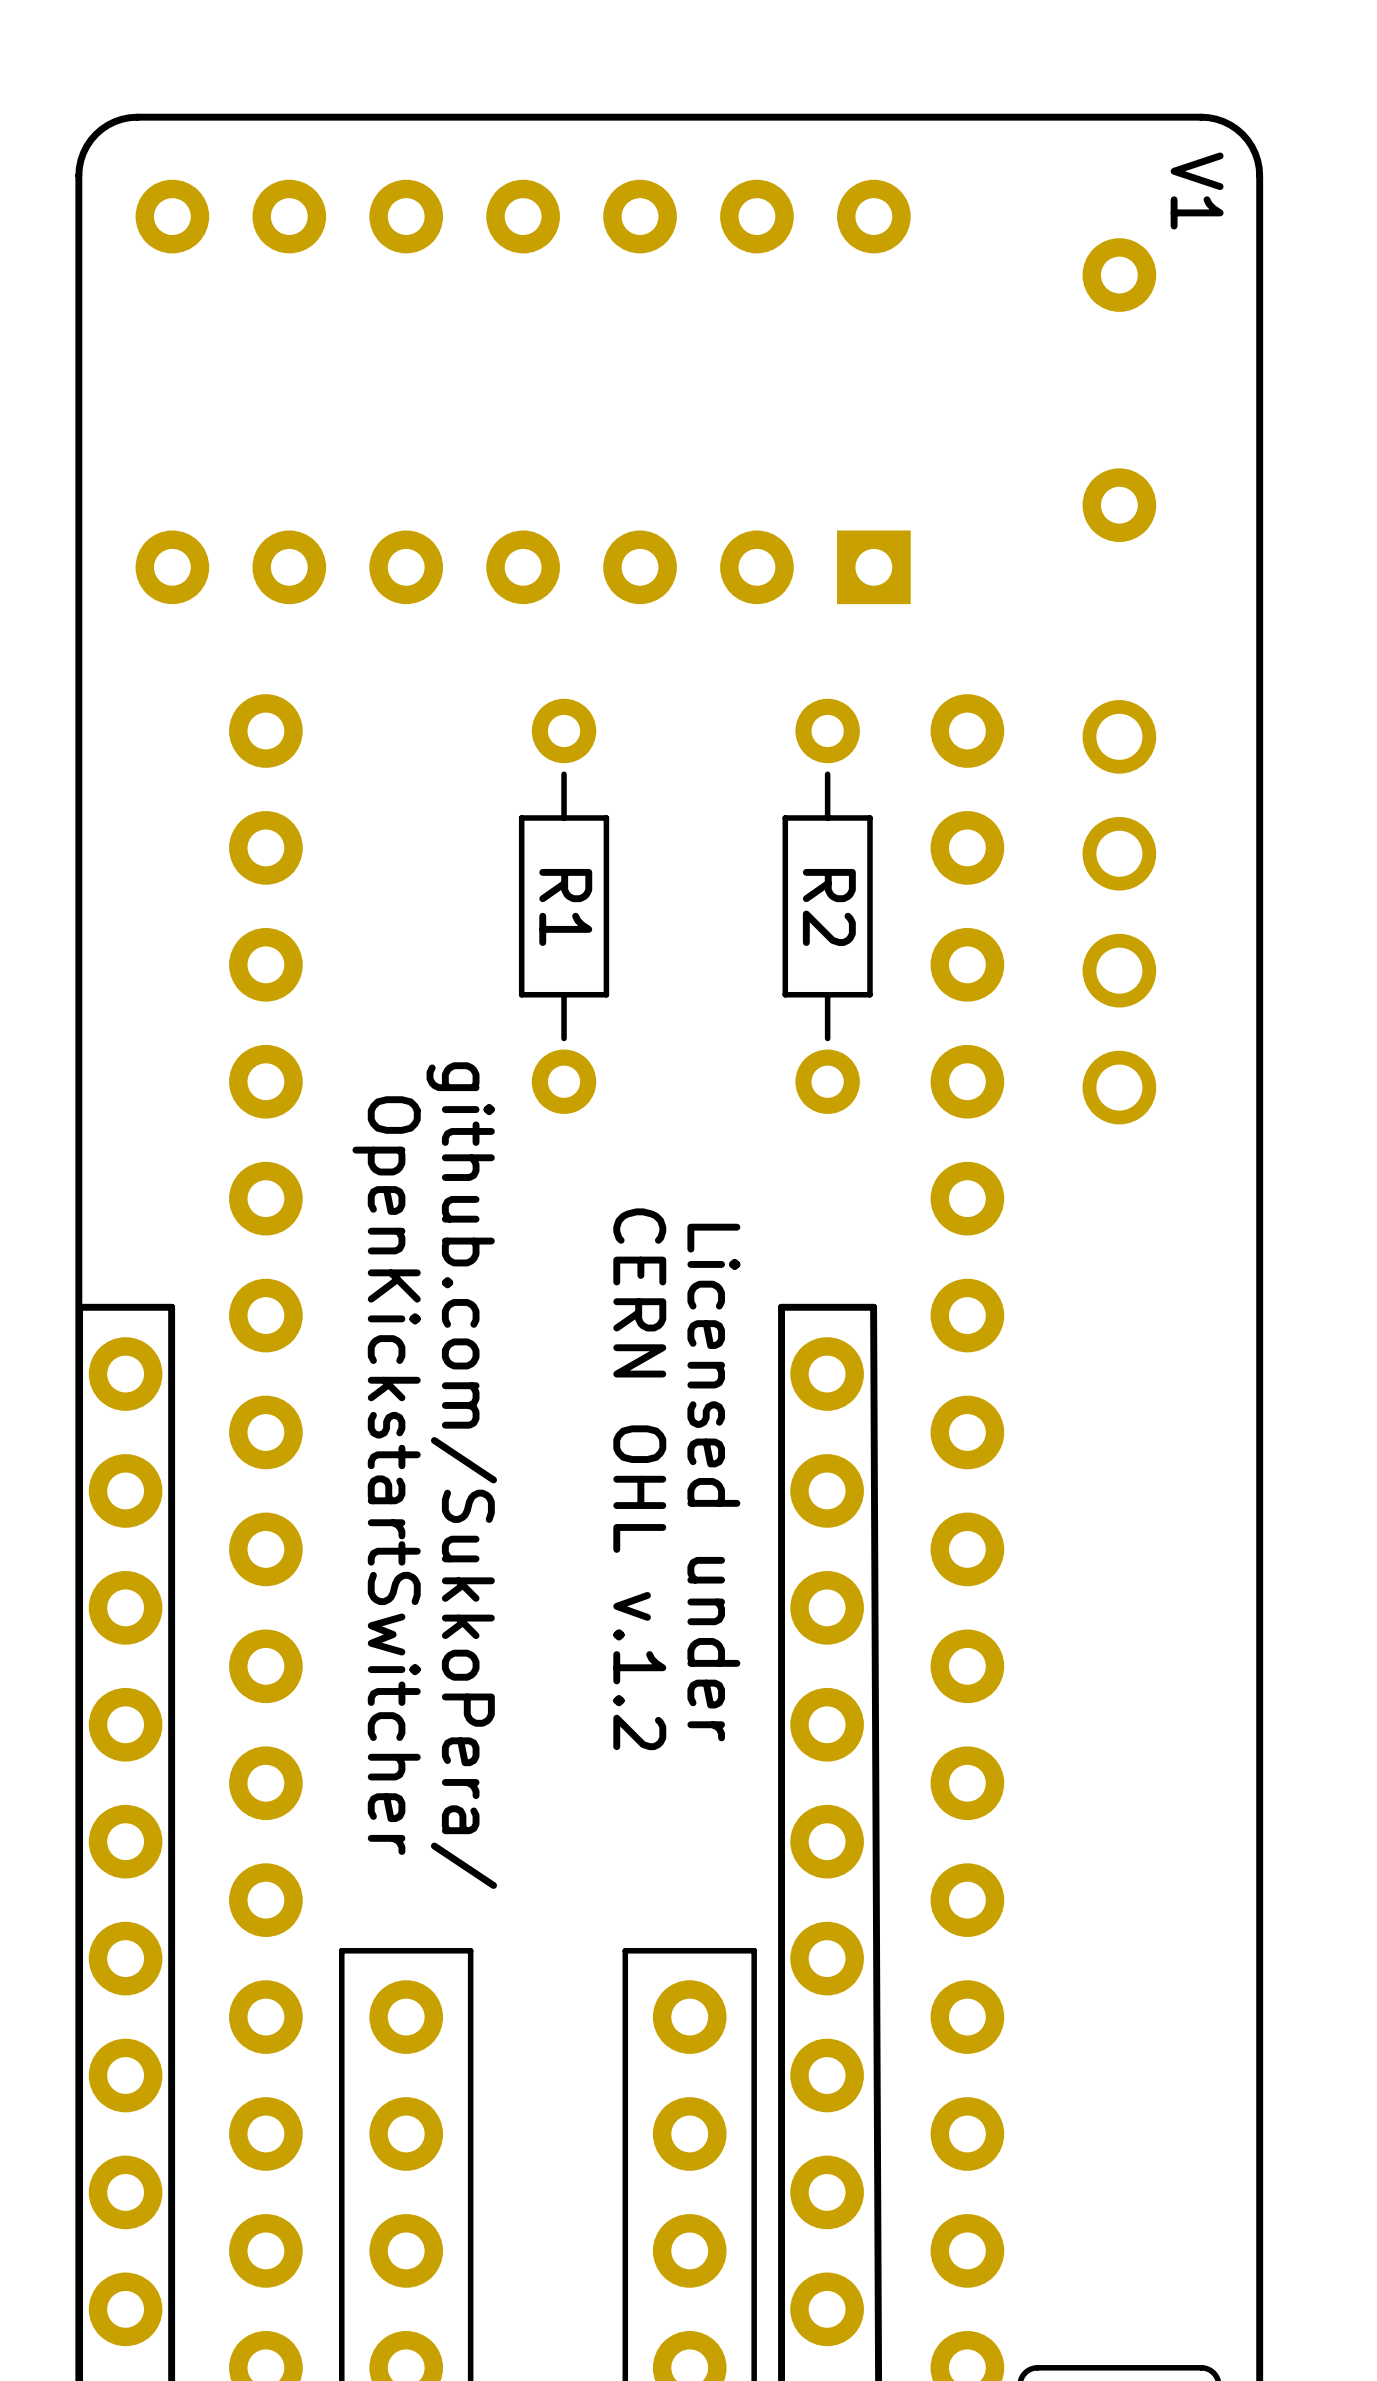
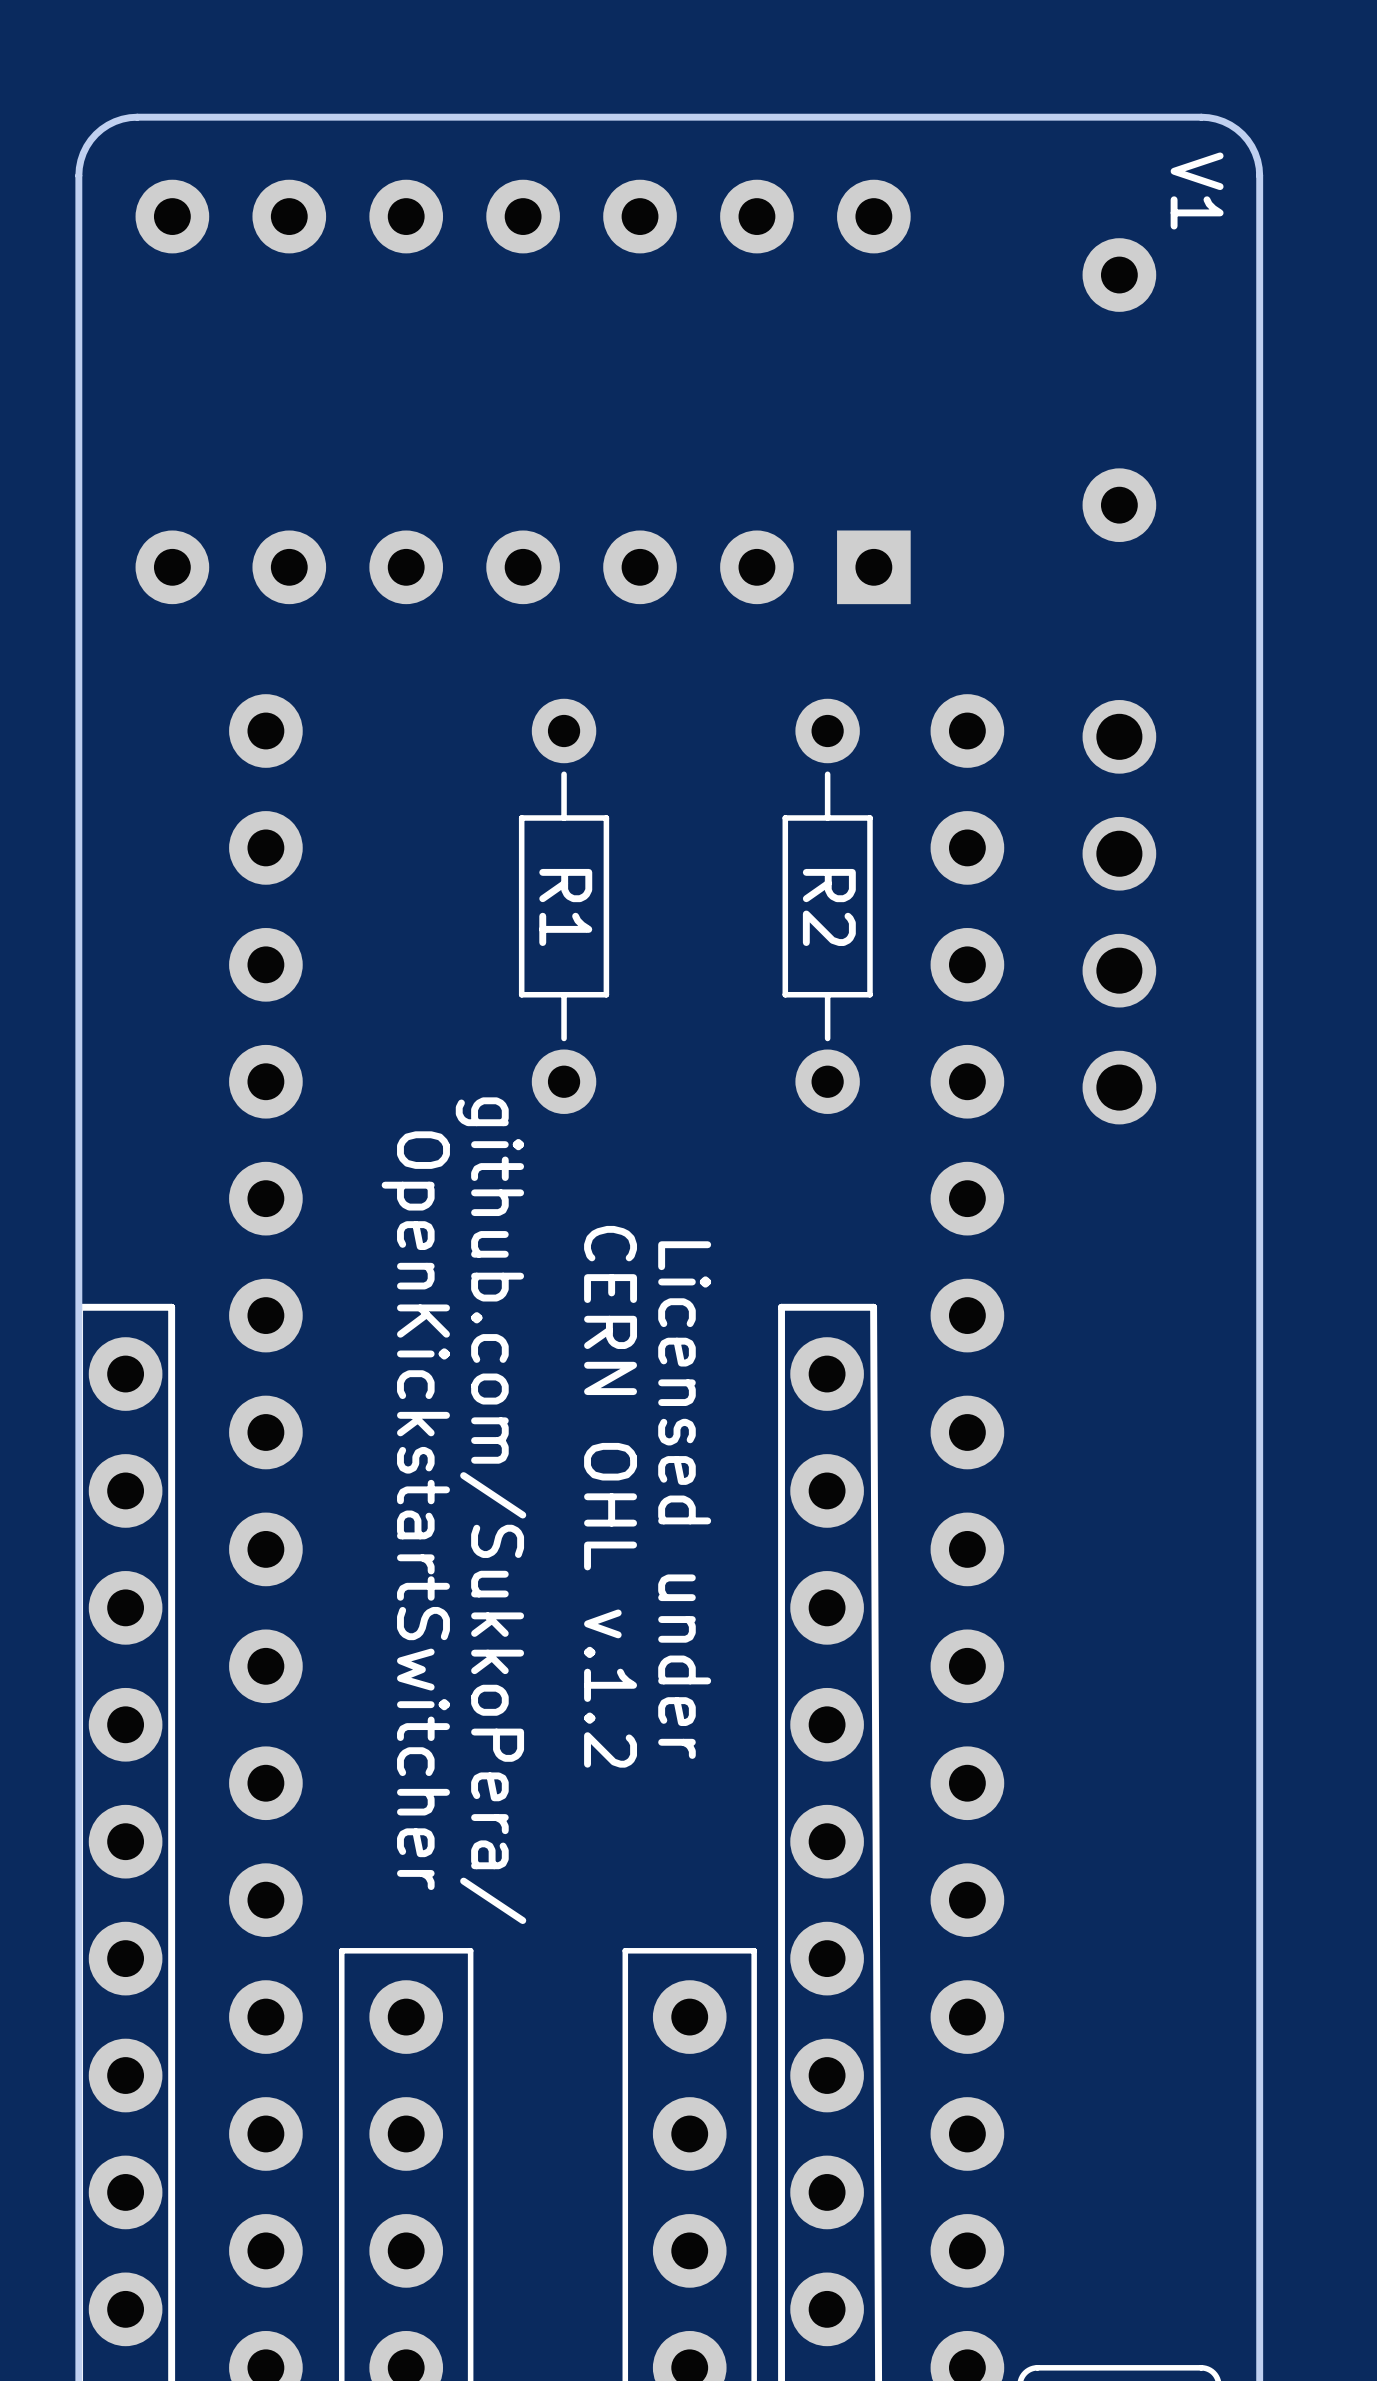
text position: OpenKickstartSwitcher (386, 1475) -> OpenKickstartSwitcher (415, 1510)
text position: github.com/SukkoPera/ (461, 1475) -> github.com/SukkoPera/ (491, 1510)
text position: CERN OHL v.1.2 (639, 1479) -> CERN OHL v.1.2 (610, 1496)
text position: Licensed under (713, 1482) -> Licensed under (684, 1500)

